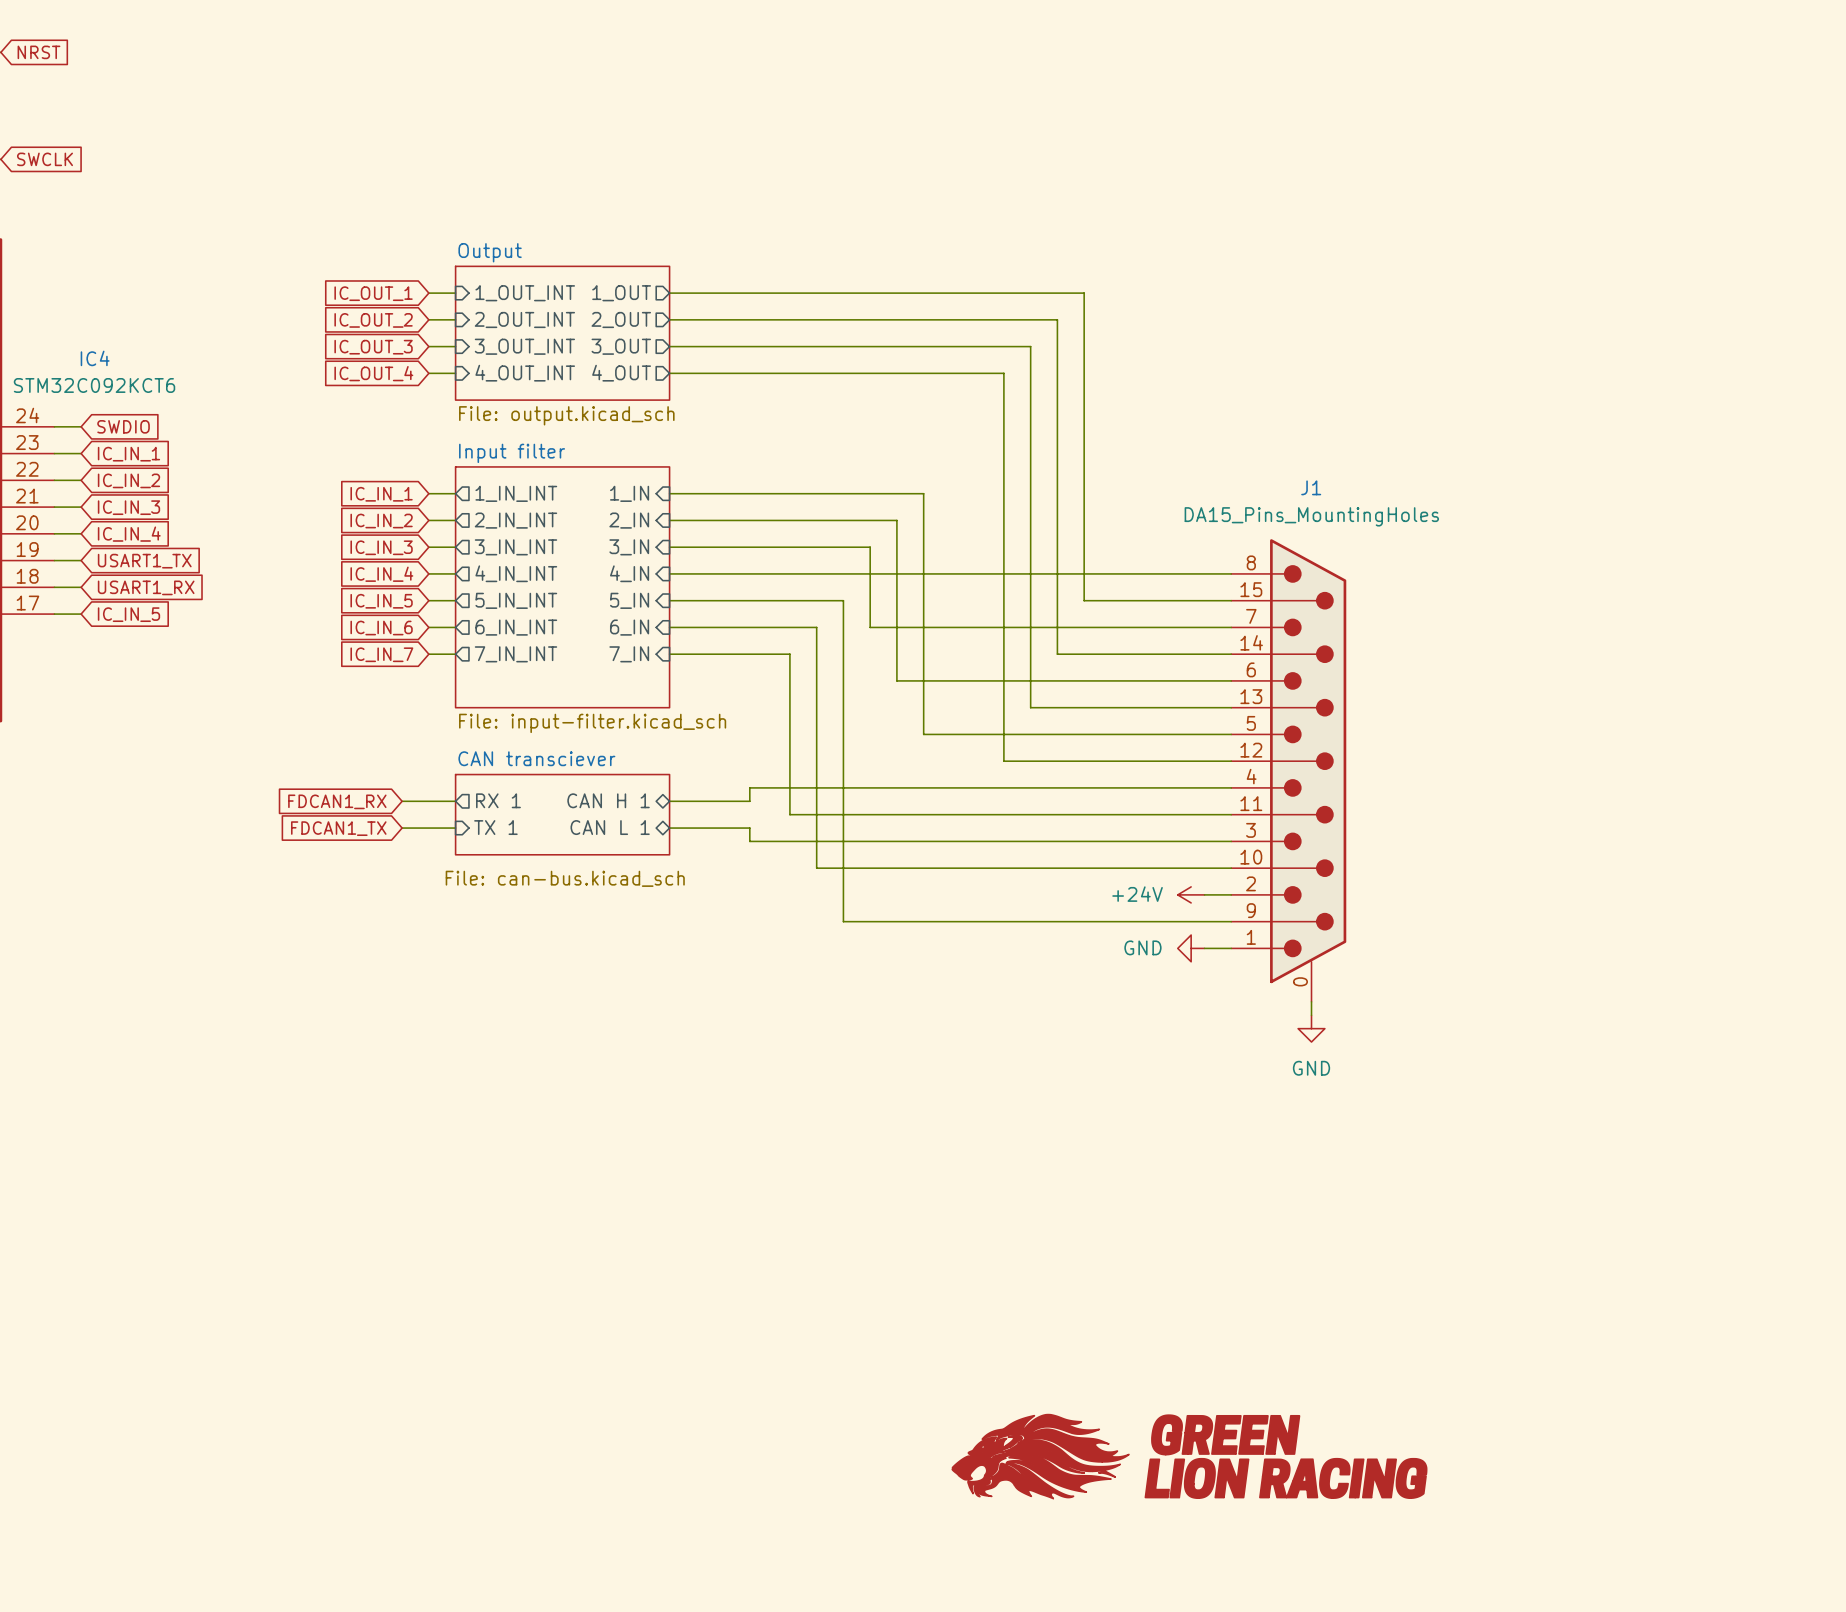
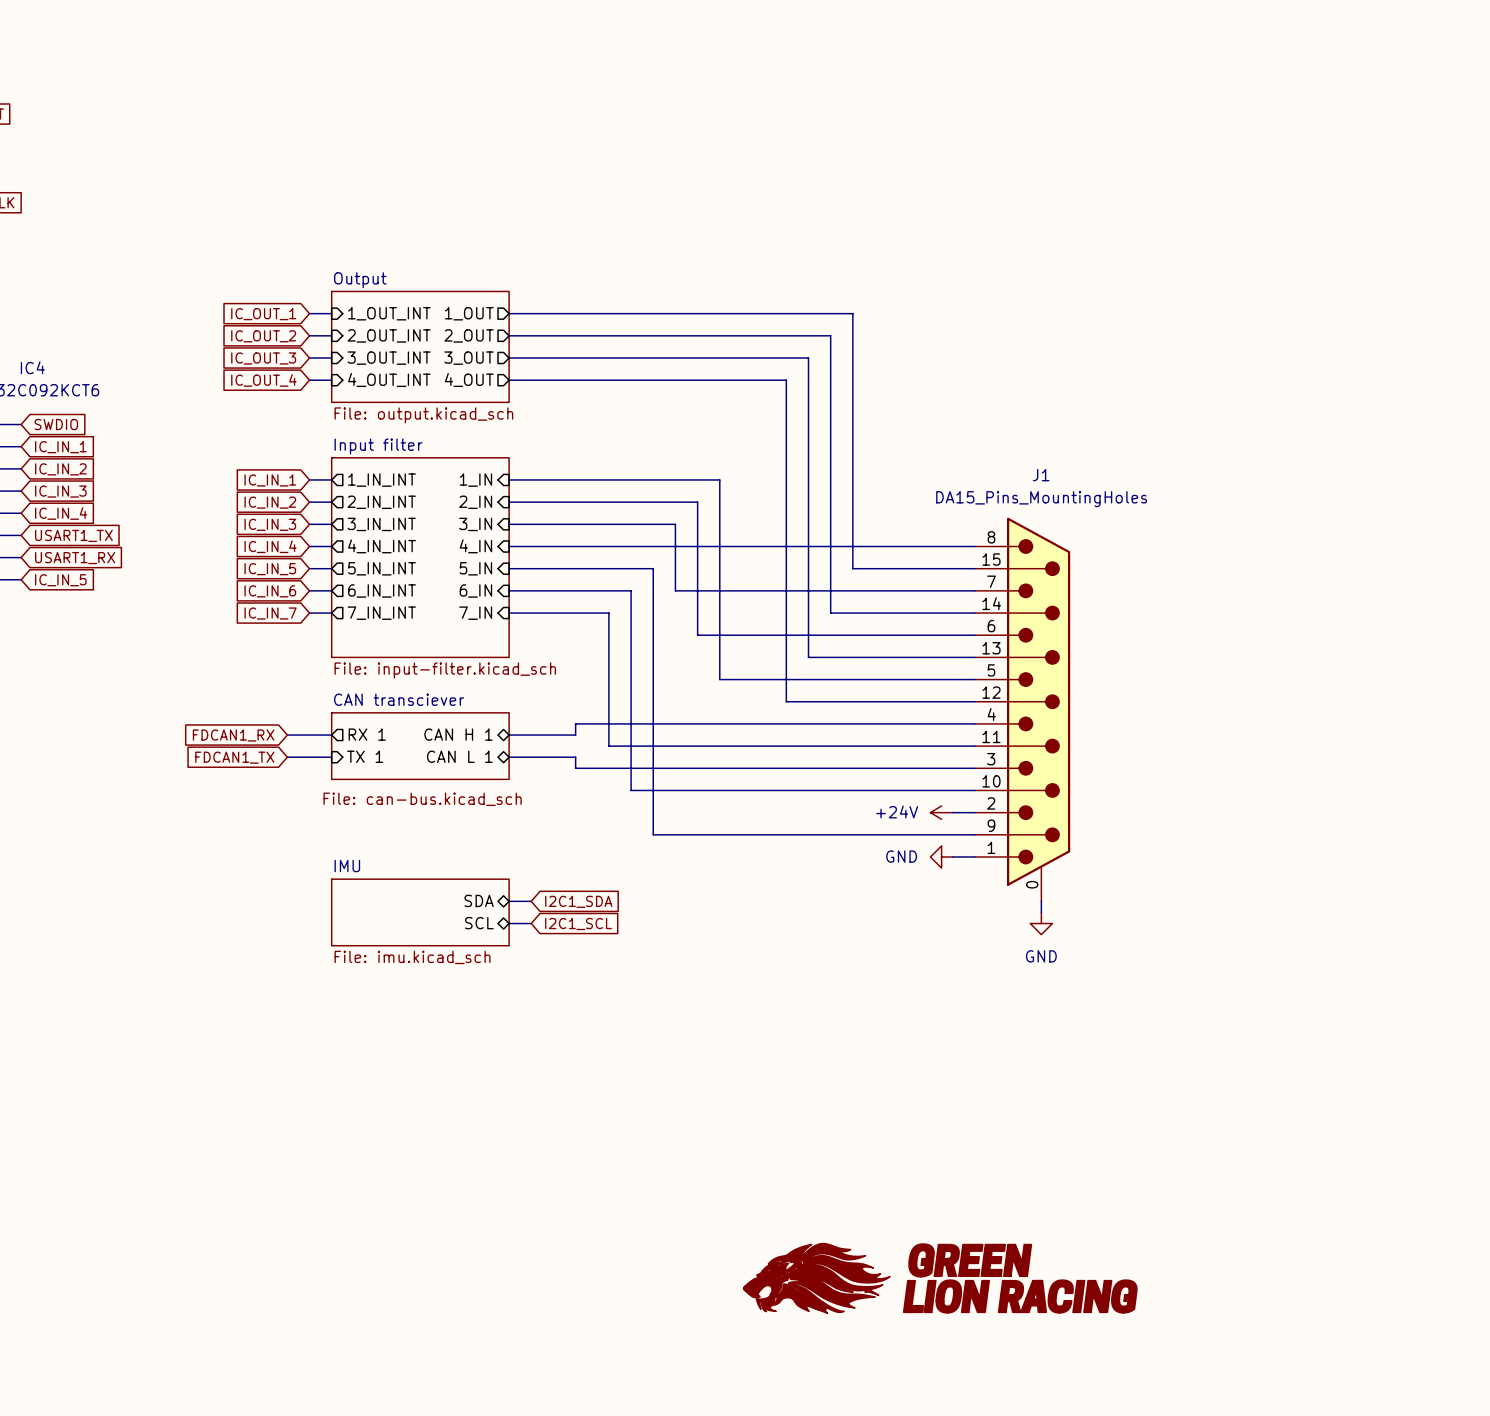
sheet pin: none -> SDA (479, 900)
wire: none -> (509, 901) (531, 901)
global label: none -> I2C1_SDA (578, 901)
sheet IMU: none -> File: imu.kicad_sch (420, 912)
sheet pin: none -> SCL (479, 923)
wire: none -> (509, 923) (531, 923)
global label: none -> I2C1_SCL (578, 924)

